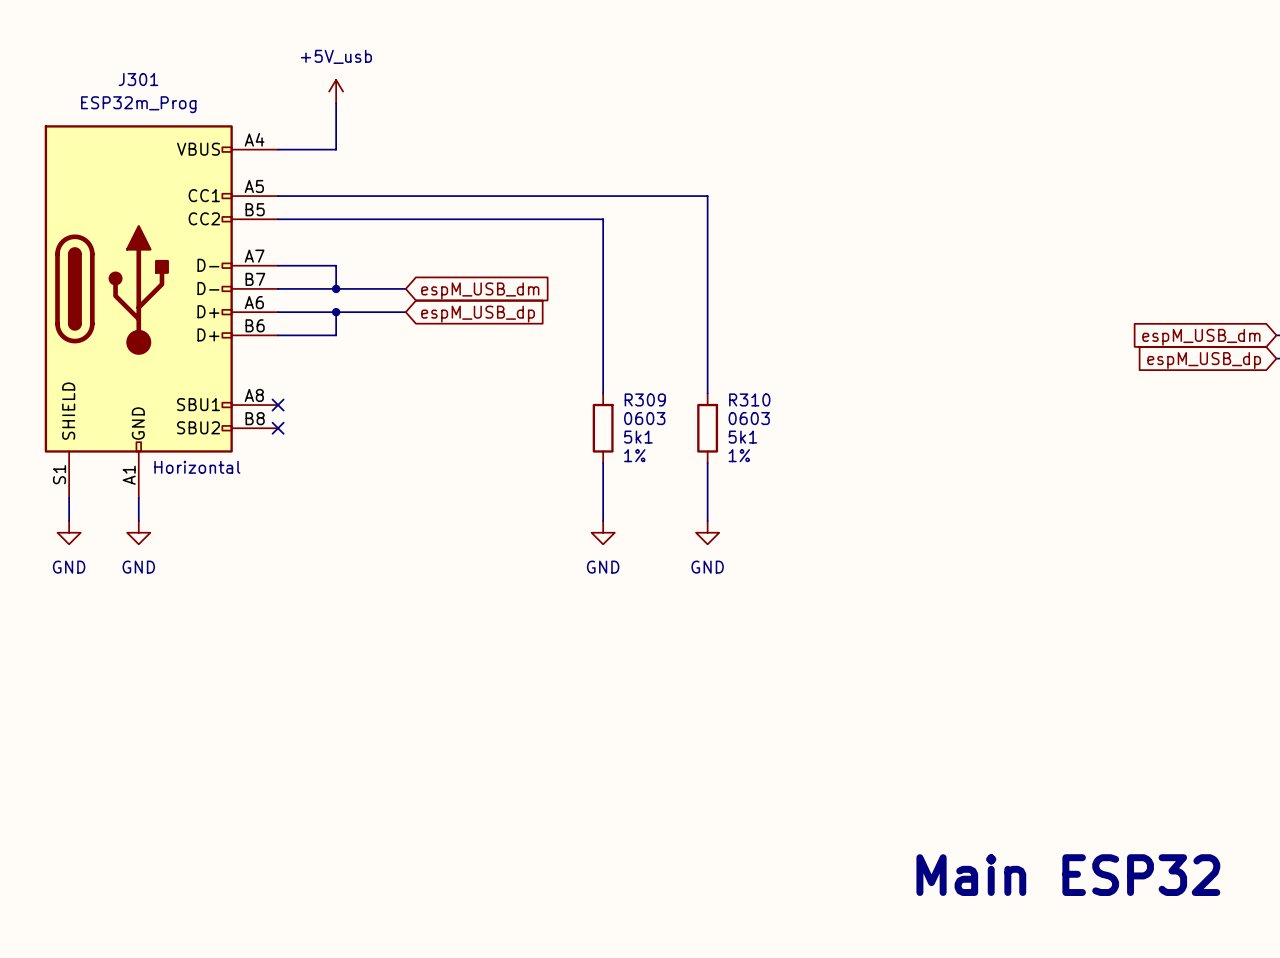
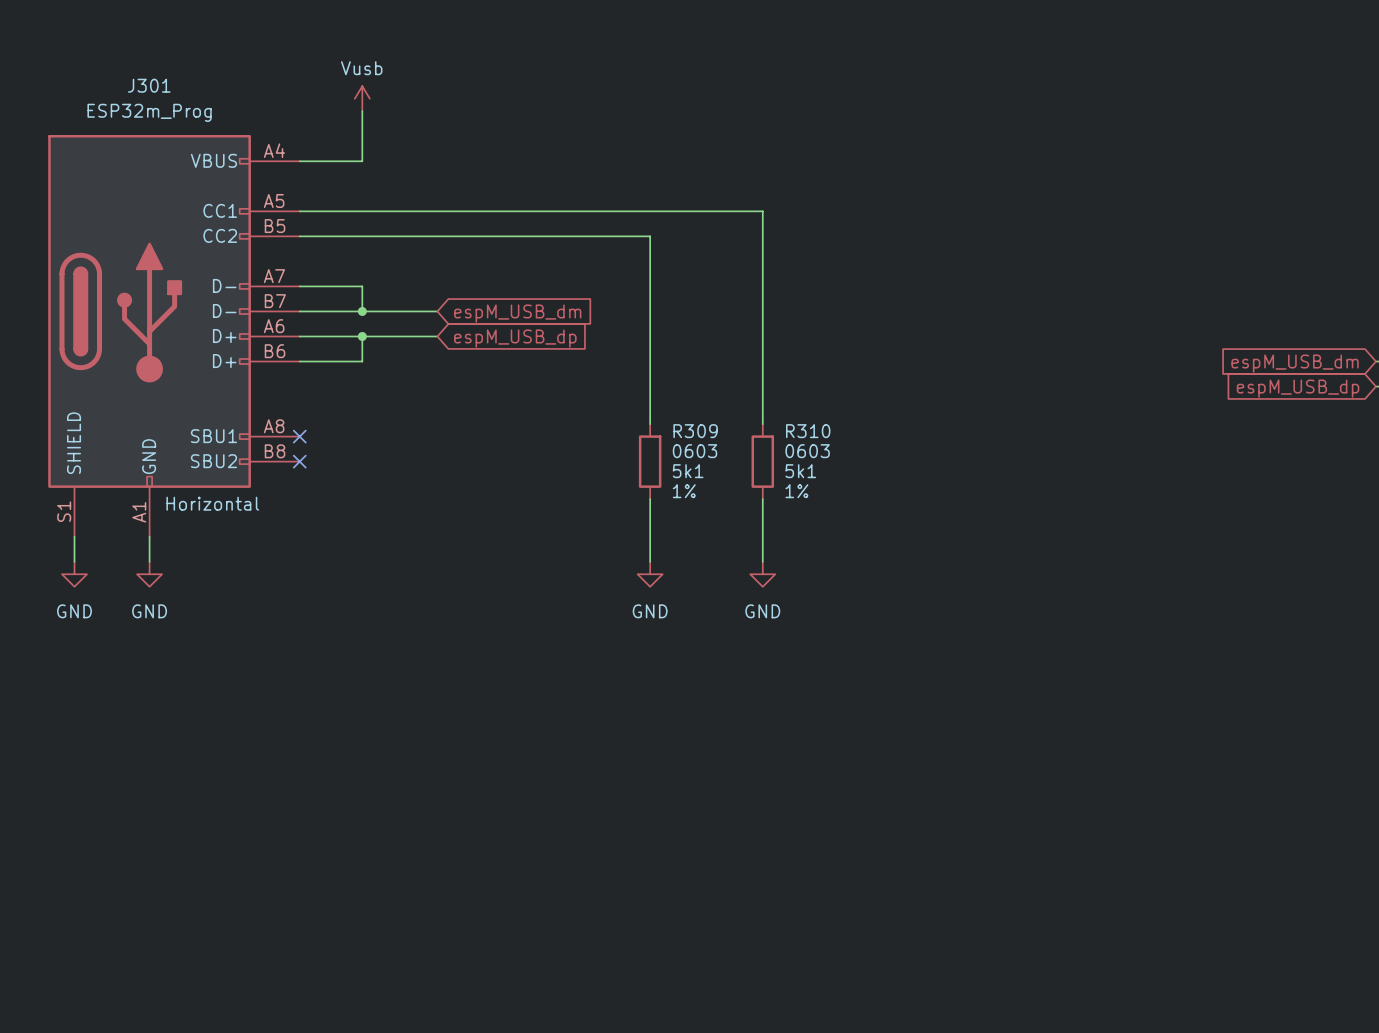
power symbol: +5V_usb (336, 91) -> Vusb (362, 98)
text: Main ESP32 (1068, 875) -> none

